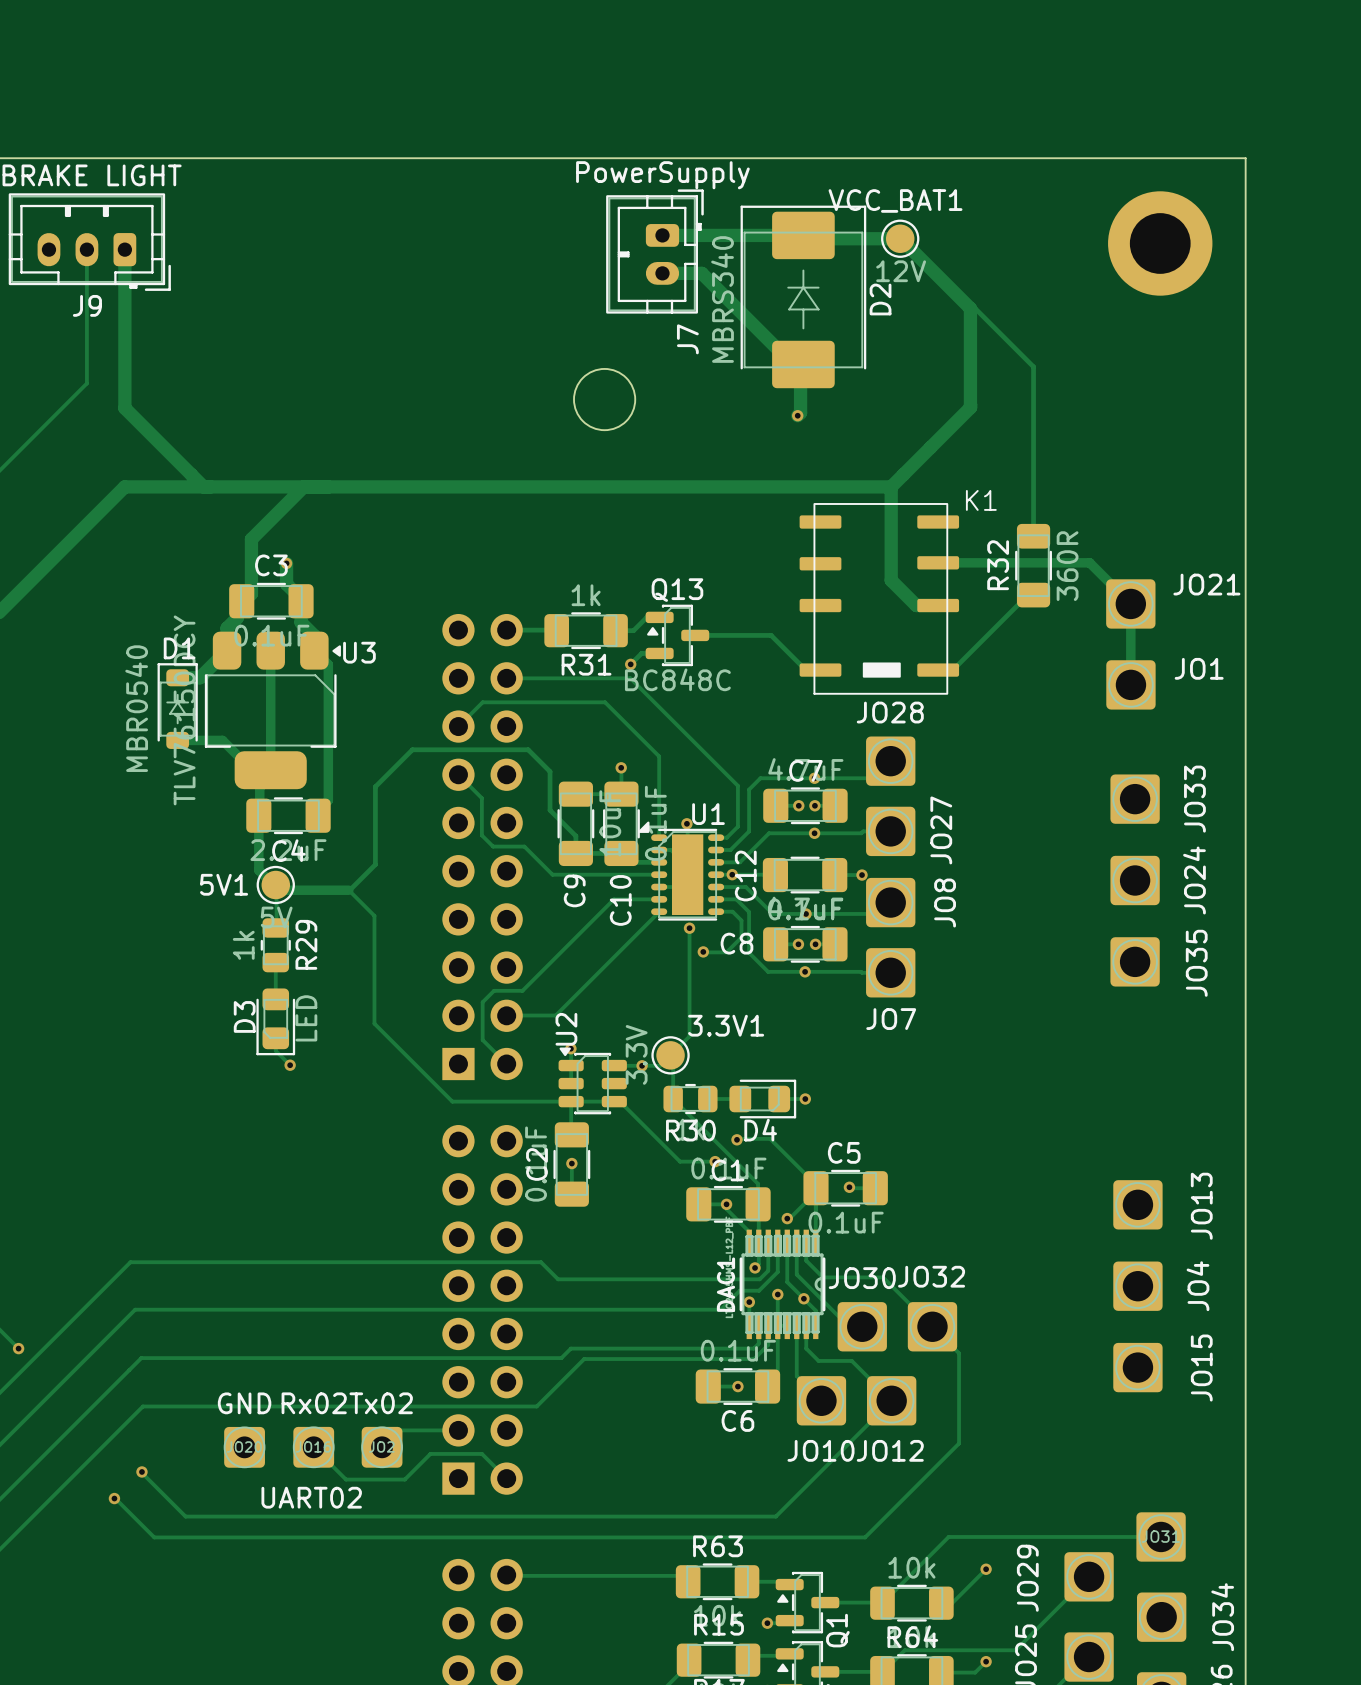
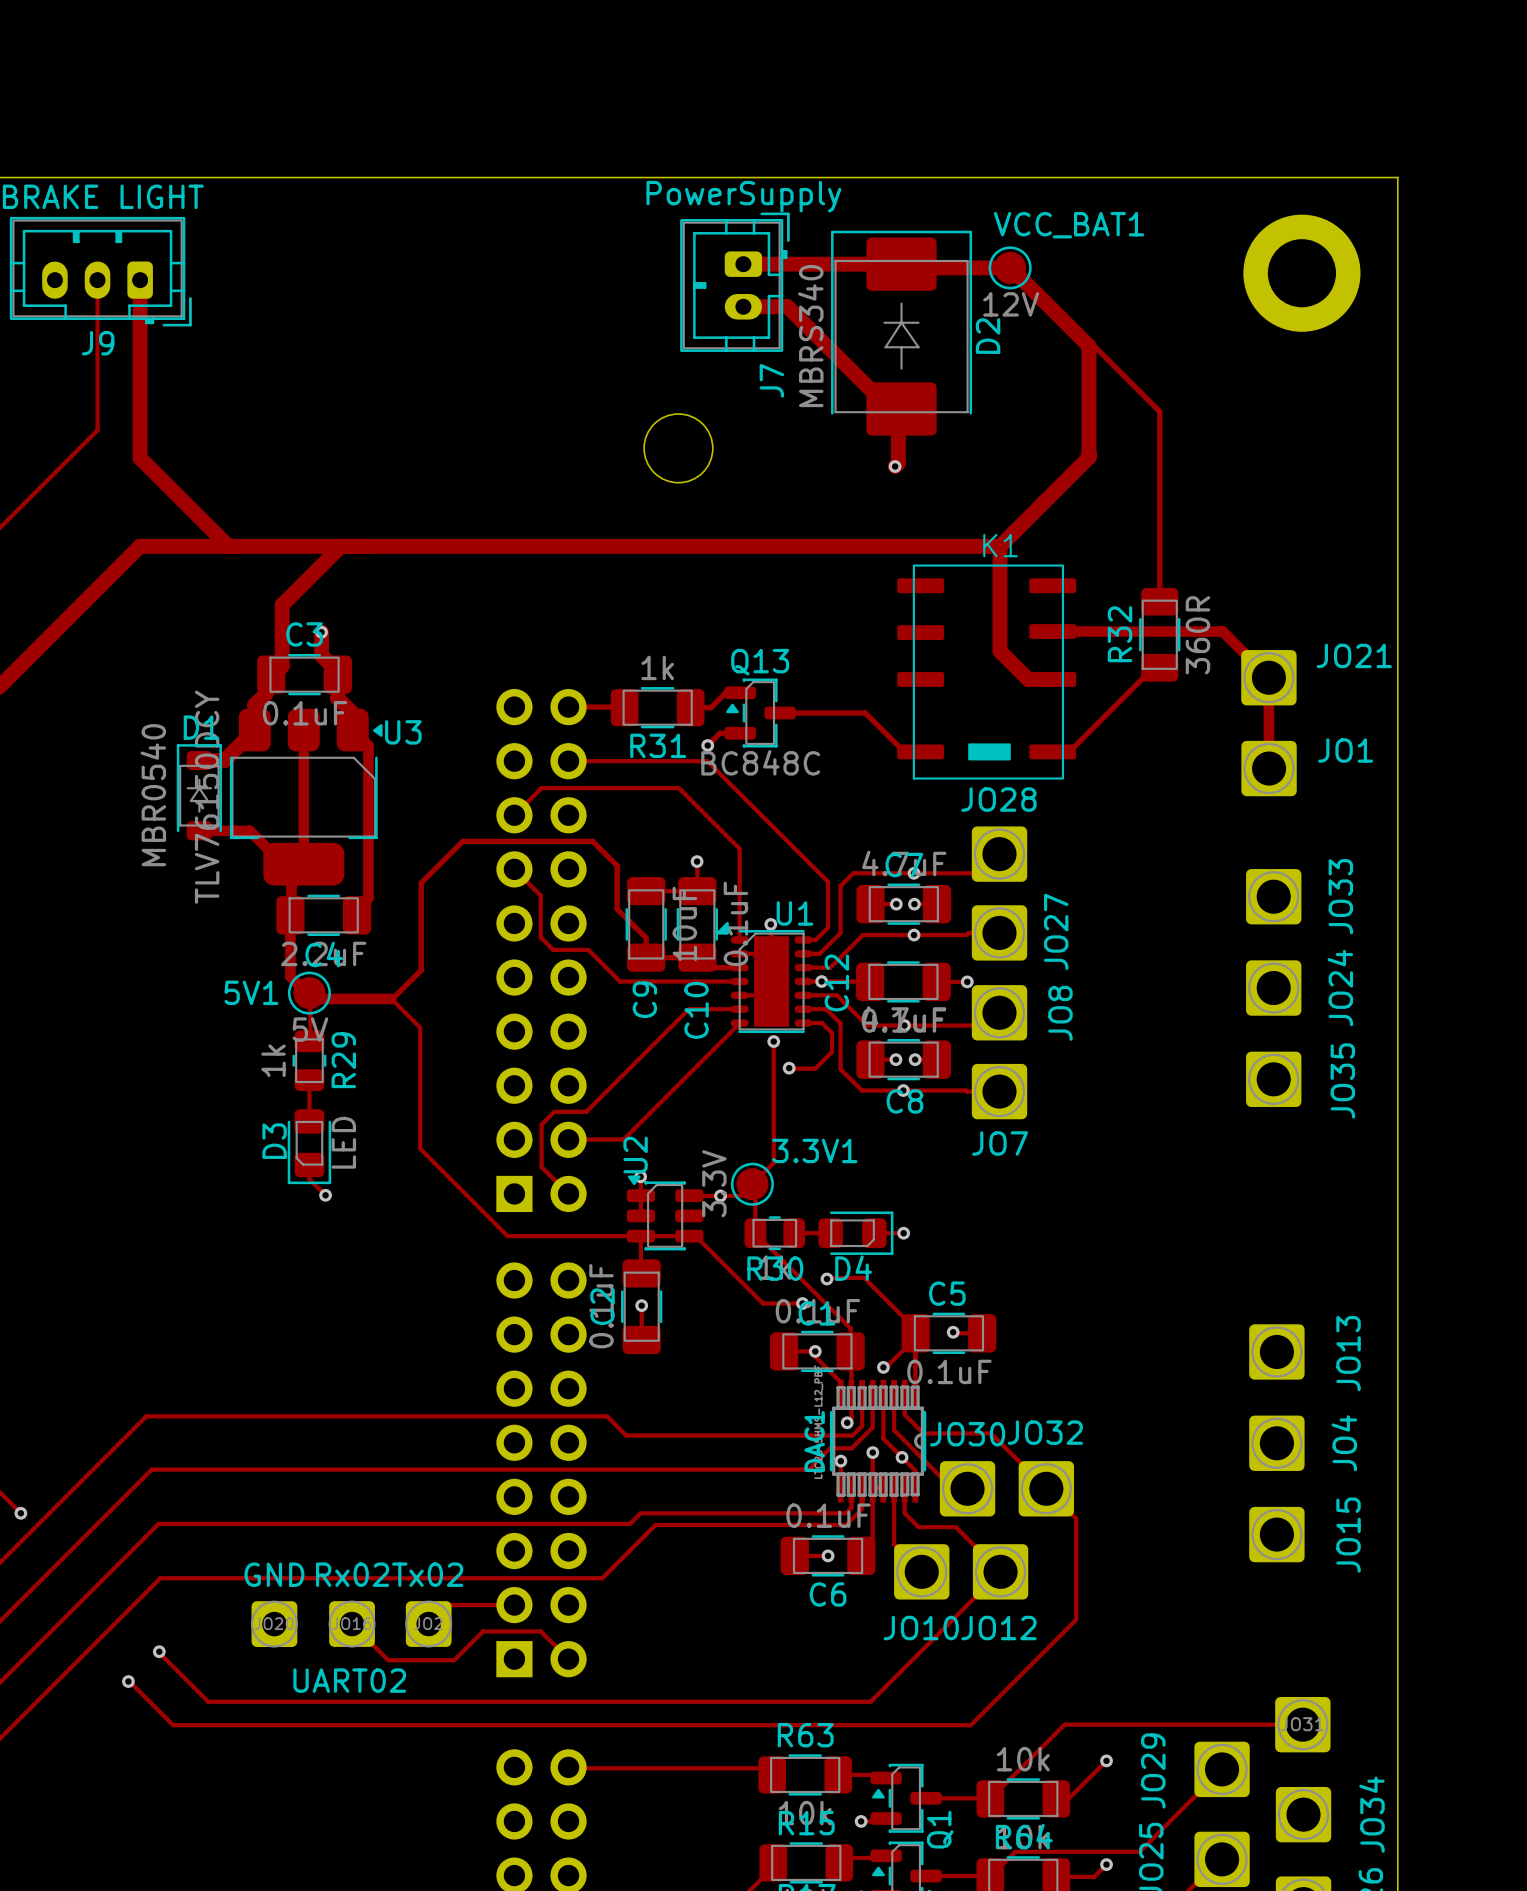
VCC_BAT1 name position: VCC_BAT1 (895, 200) -> VCC_BAT1 (1068, 225)
K1 name position: K1 (981, 500) -> K1 (1000, 545)
C8 name position: C8 (736, 943) -> C8 (904, 1101)

